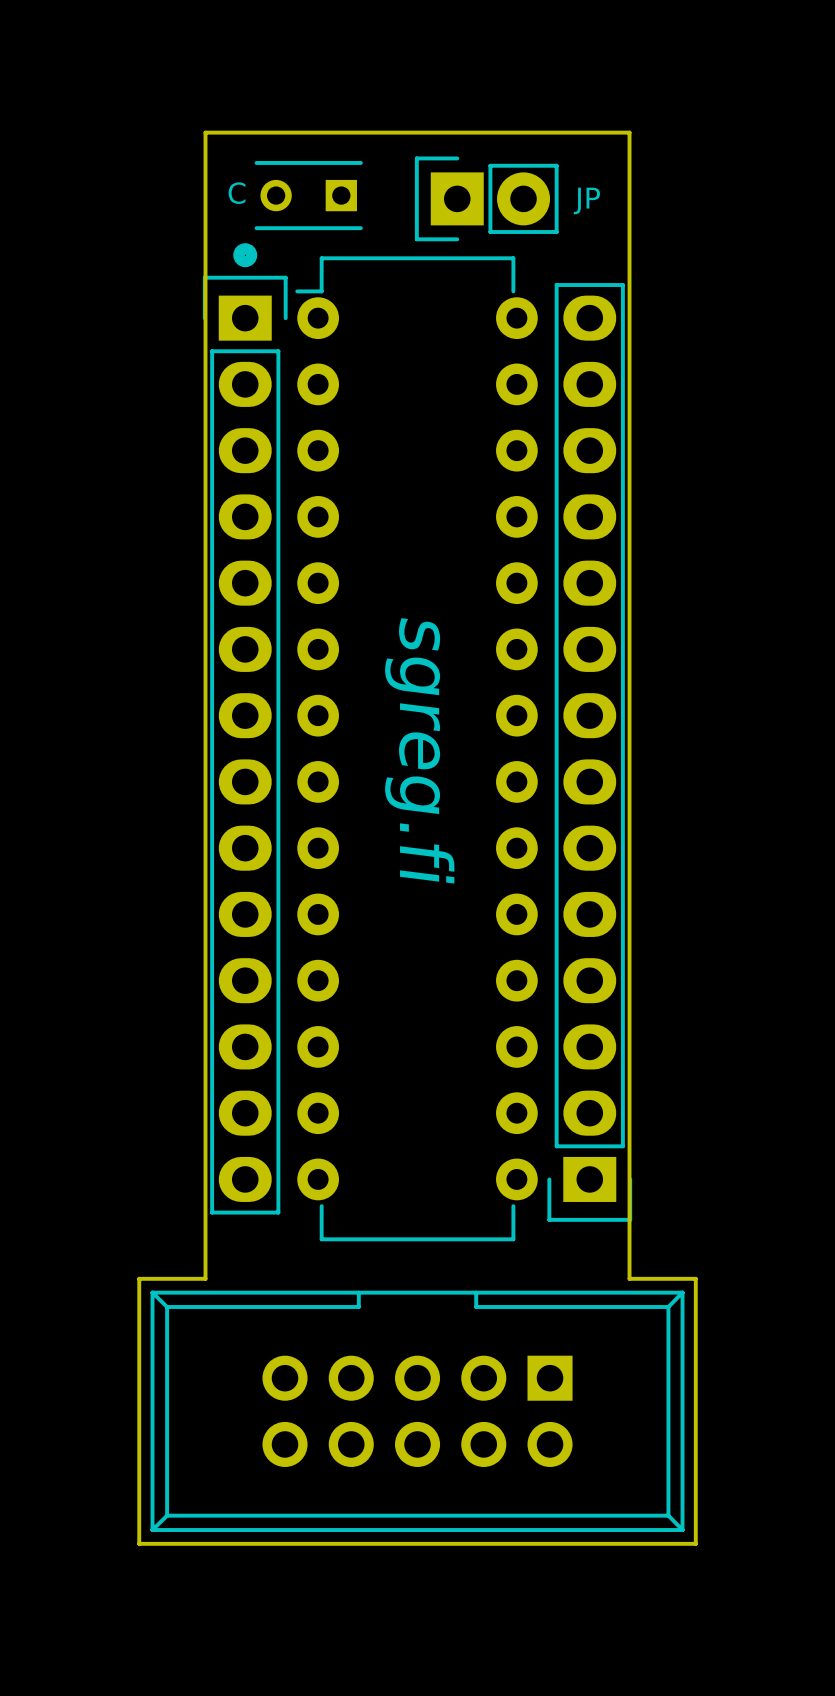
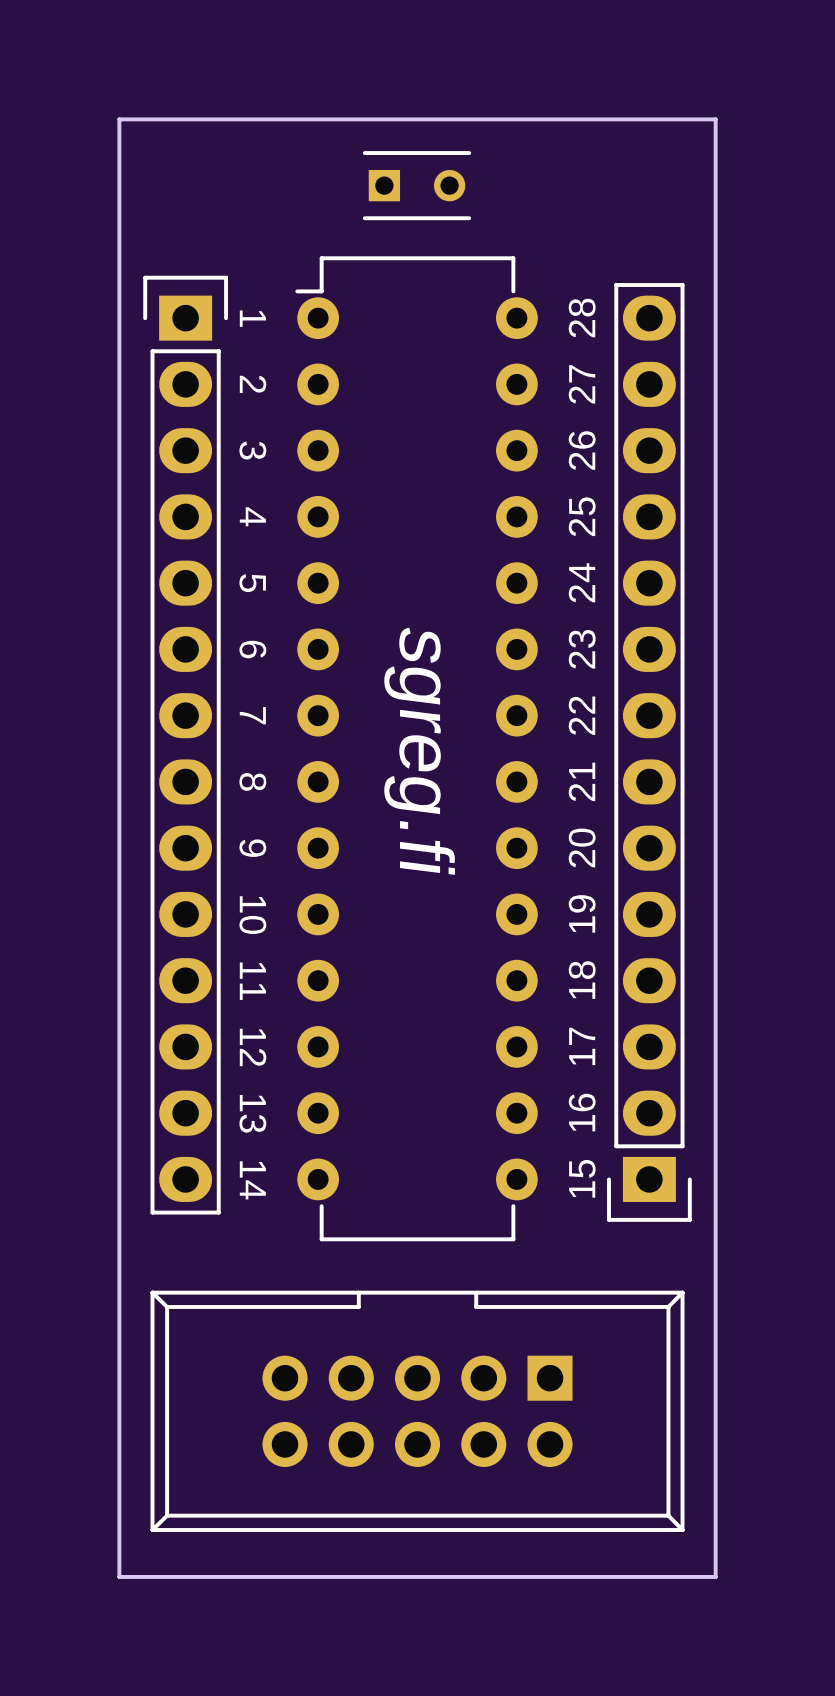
board edge: (205, 132) (205, 1278) (139, 1278) (139, 1543) (695, 1543) (695, 1278) (629, 1278) (629, 132) (205, 132) -> (119, 119) (119, 1576) (715, 1576) (715, 119) (119, 119)
text: C (237, 193) -> none
part rotation: 0° (308, 195) -> 180° (417, 185)
part position: (308, 195) -> (417, 185)
part: (486, 198) -> none
text: JP (586, 200) -> none
drawing: [233, 243, 258, 268] -> none
text: none -> 1 (252, 318)
text: none -> 28 (582, 318)
text: none -> 2 (253, 384)
text: none -> 27 (581, 384)
text: none -> 3 (252, 450)
text: none -> 26 (582, 450)
text: none -> 4 (252, 516)
text: none -> 25 (582, 516)
text: none -> 5 (252, 583)
text: none -> 24 (581, 582)
text: none -> 6 (252, 649)
text: none -> 23 (582, 649)
text: none -> 7 (252, 715)
text: none -> 22 (581, 715)
part position: (245, 745) -> (185, 745)
part position: (589, 752) -> (649, 752)
text: none -> 8 (252, 781)
text: none -> 21 (581, 781)
text: none -> 9 (252, 848)
text: none -> 20 (582, 847)
text: none -> 19 (582, 913)
text: none -> 10 (252, 915)
text: none -> 18 (582, 980)
text: none -> 11 (252, 981)
text: none -> 17 (582, 1046)
text: none -> 12 (253, 1047)
text: none -> 16 (582, 1112)
text: none -> 13 (252, 1113)
text: none -> 15 (582, 1178)
text: none -> 14 (252, 1180)

